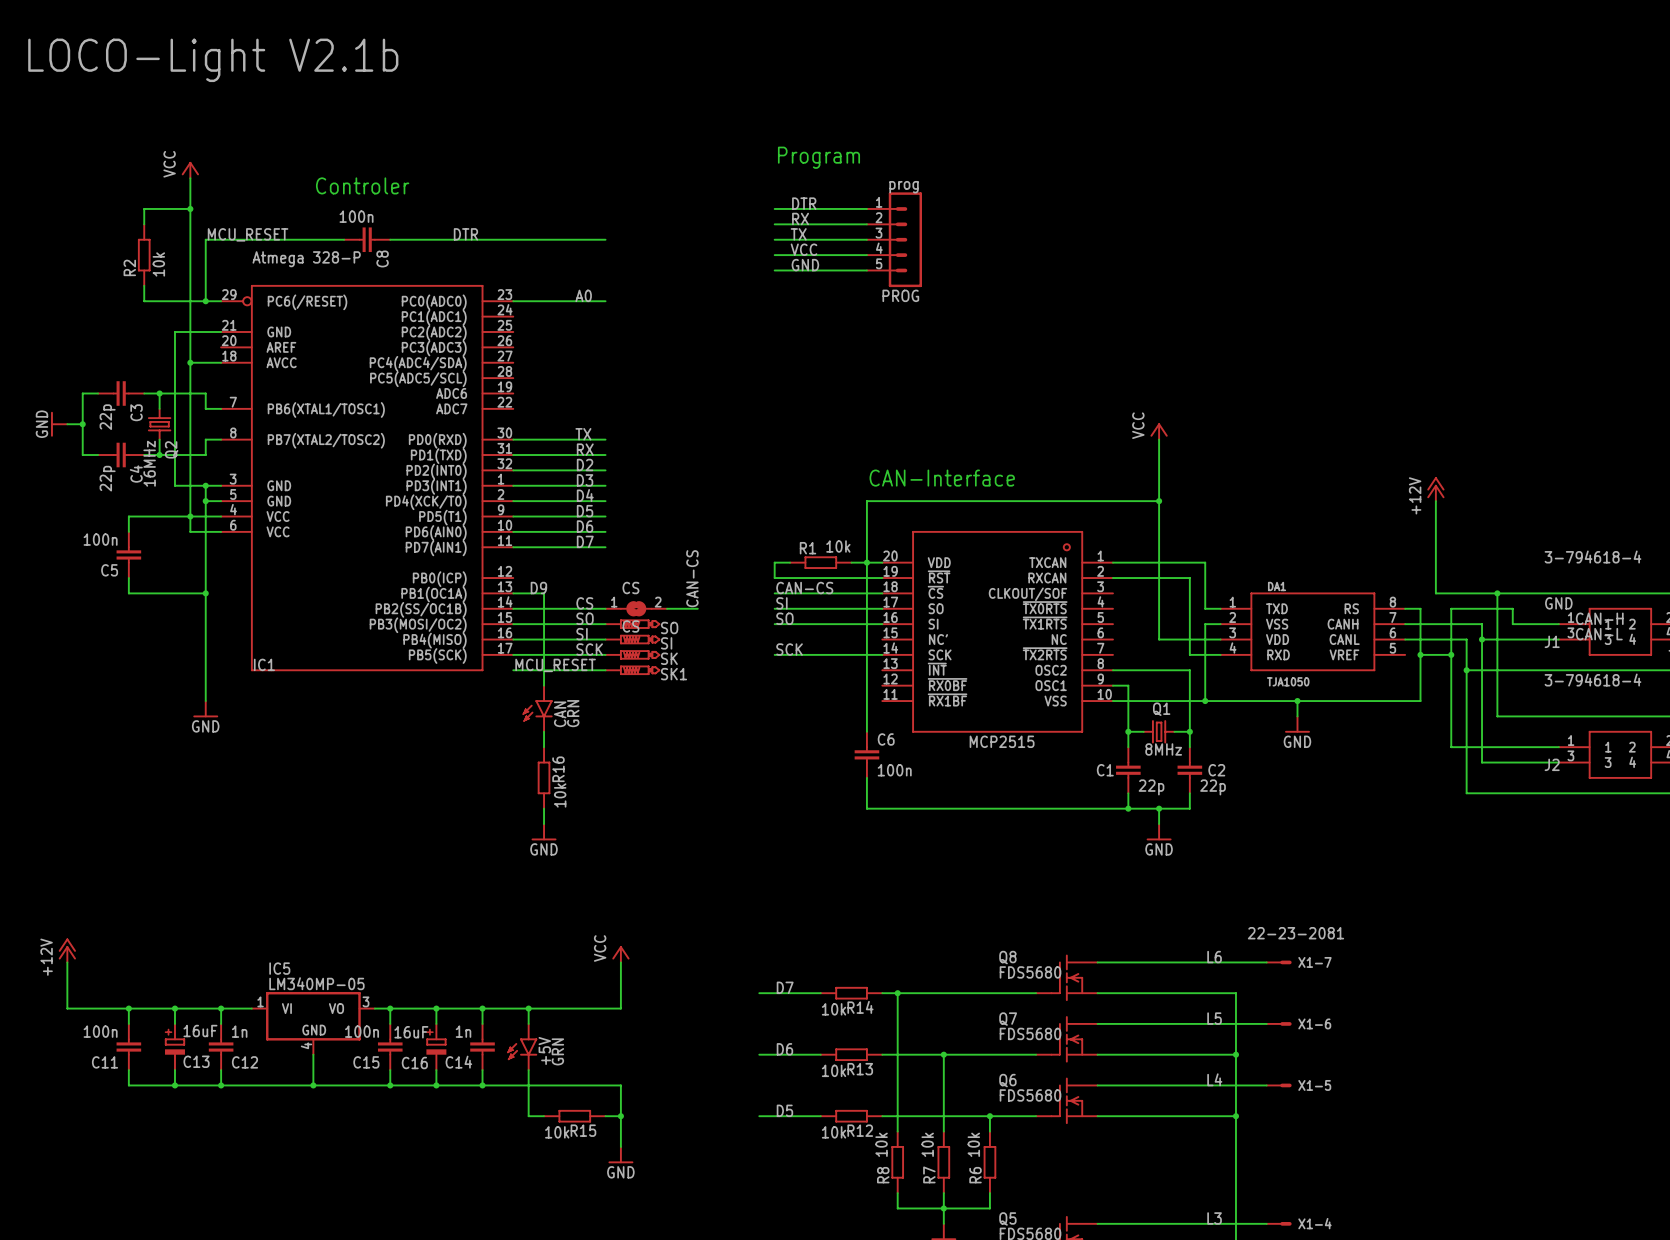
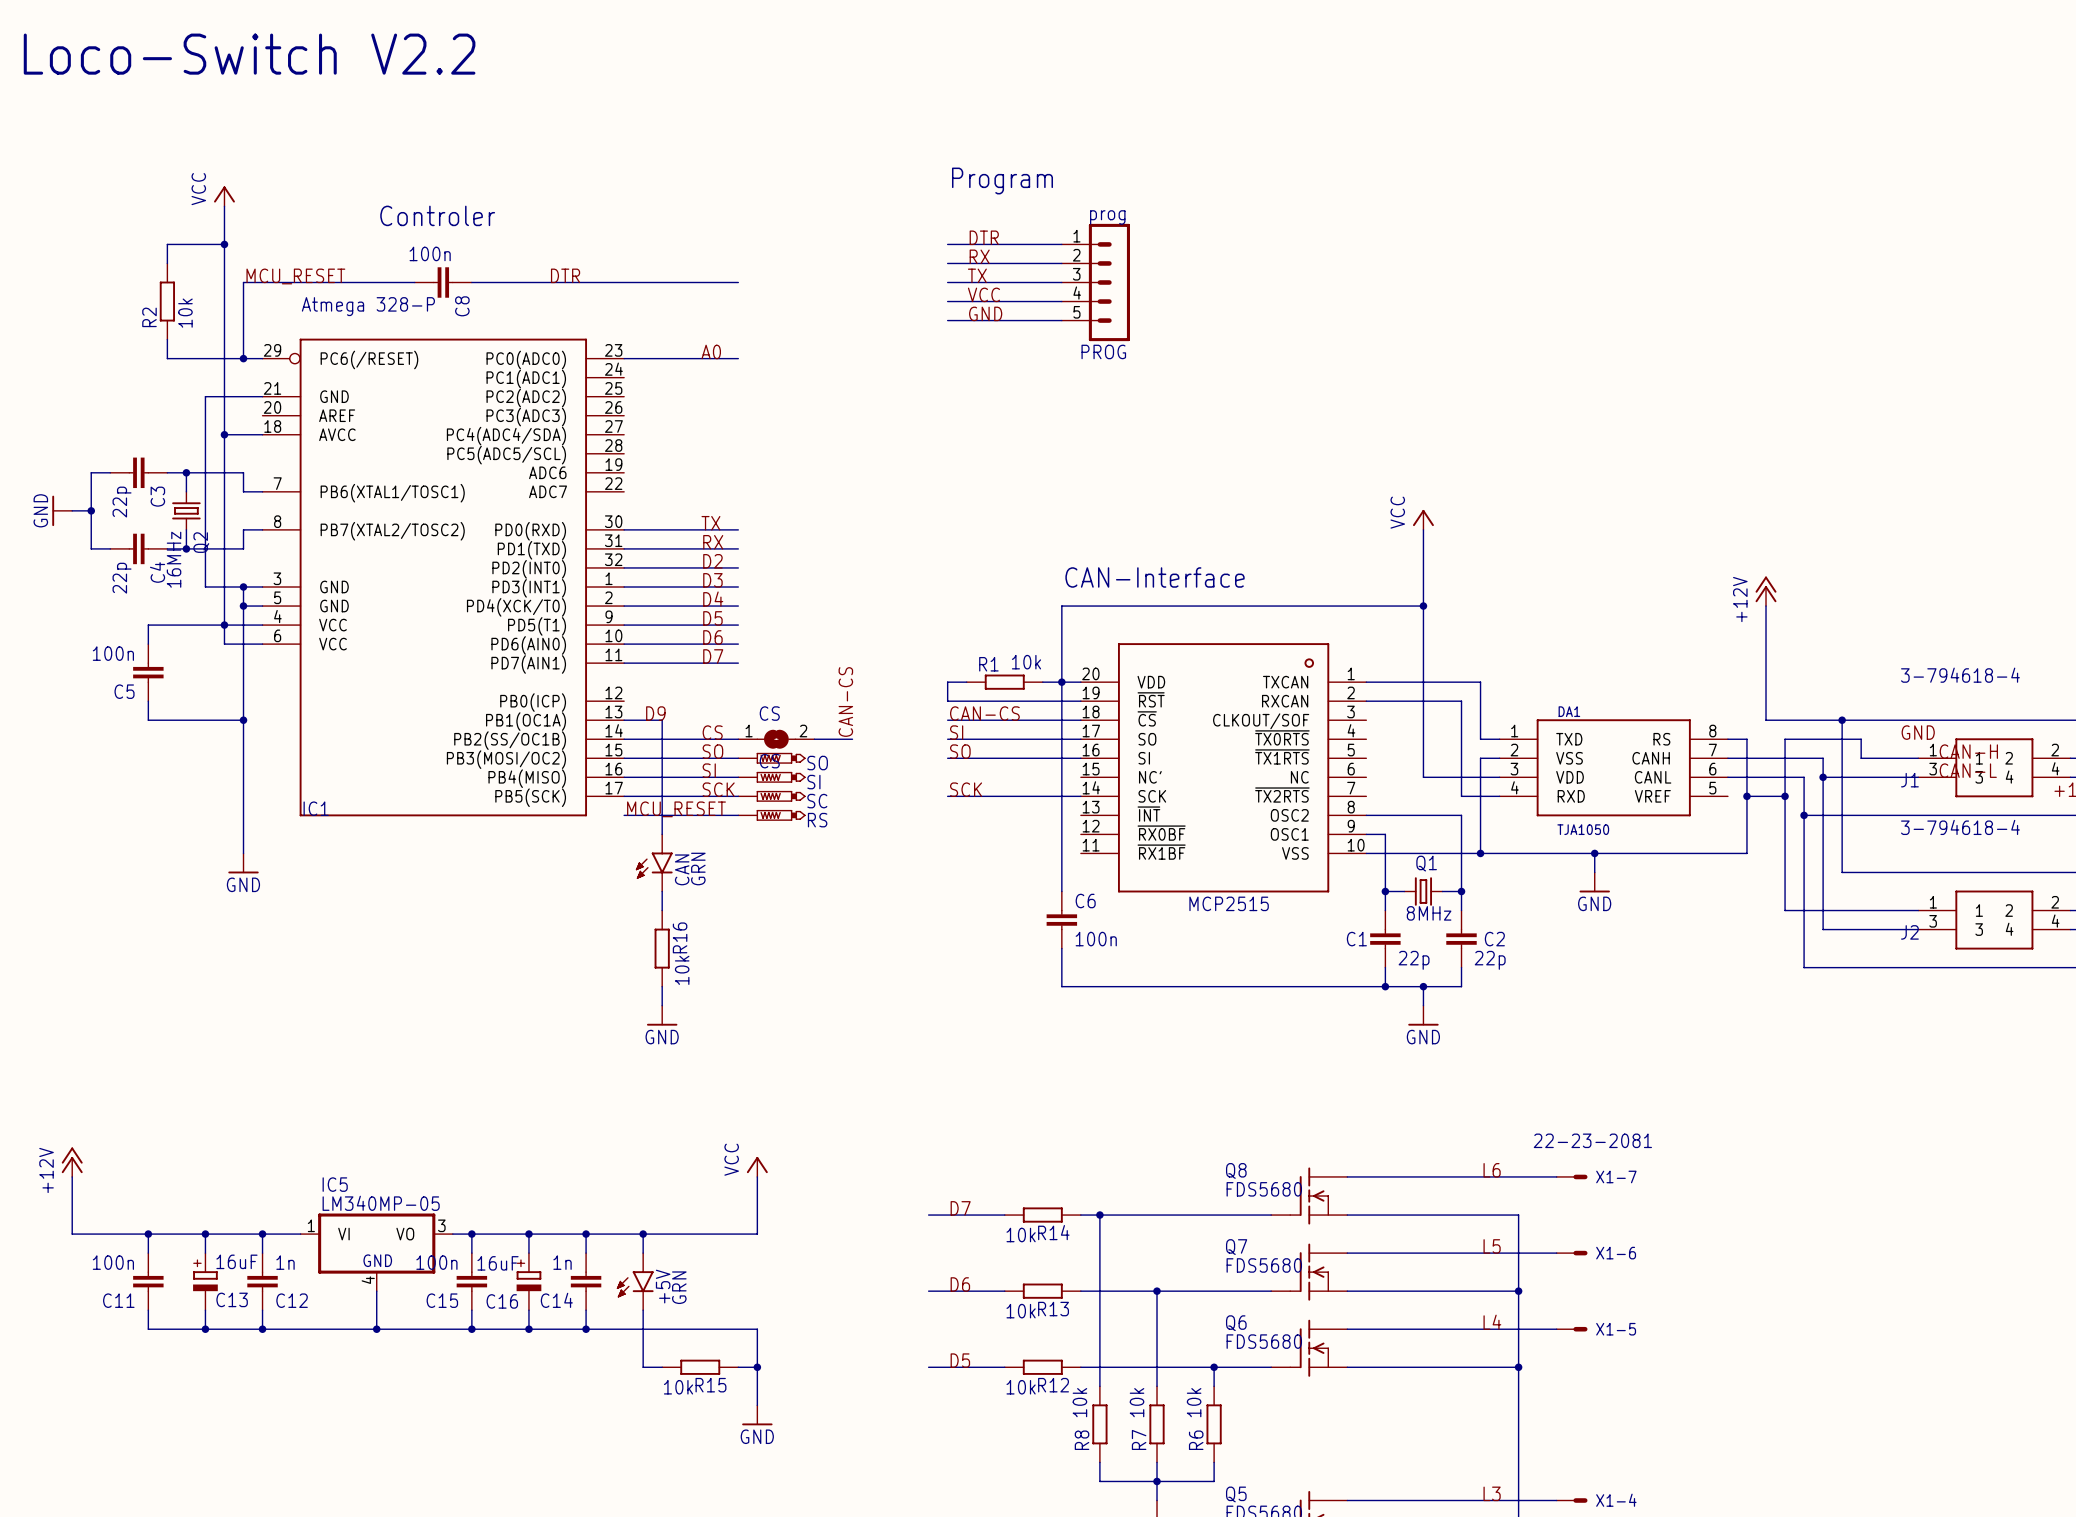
text: LOCO-Light V2.1b (213, 60) -> Loco-Switch V2.2 (249, 54)
SK name: SK (669, 658) -> SC (817, 801)
SK1 name: SK1 (673, 674) -> RS (817, 820)

